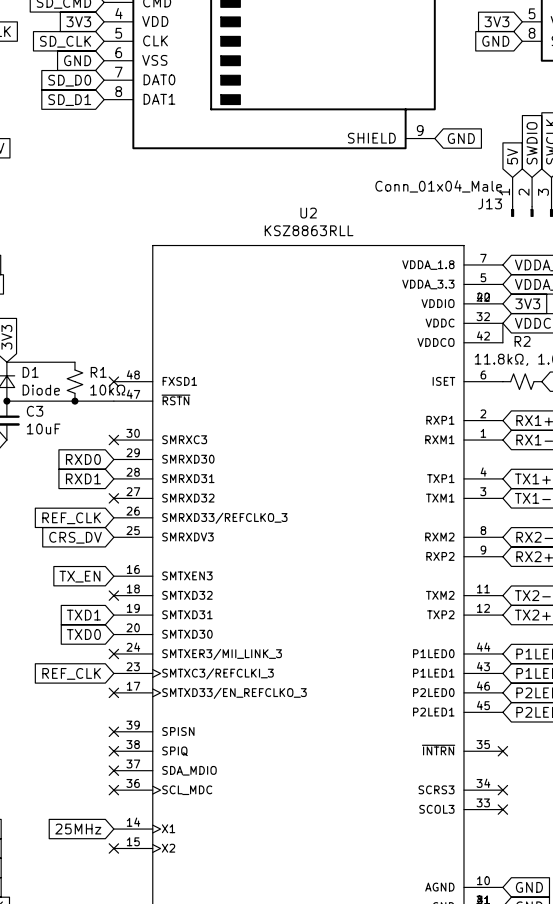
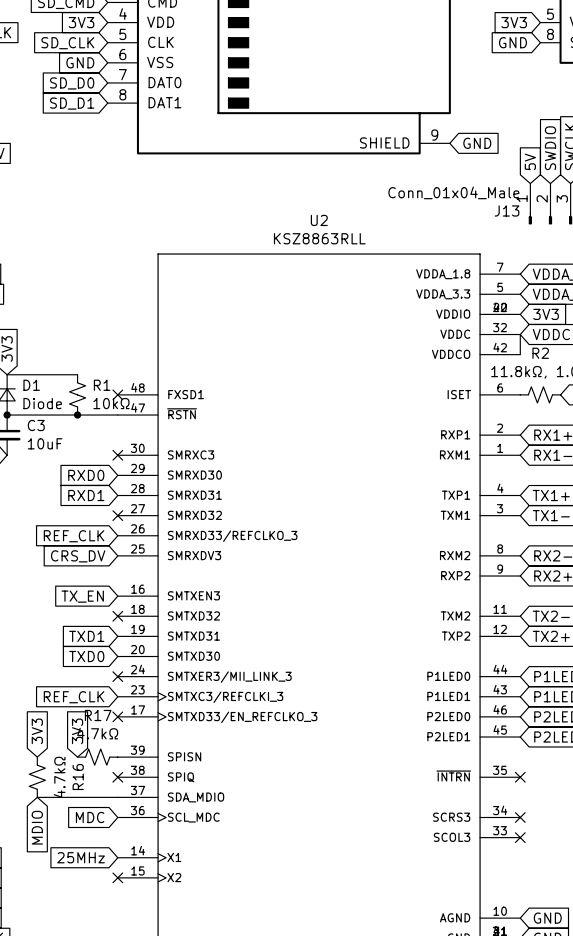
global label: none -> 3V3 (37, 731)
global label: none -> 3V3 (77, 731)
R17: none -> 4.7kΩ (97, 757)
no-connect mark: (113, 731) -> none
R16: none -> 4.7kΩ (37, 777)
wire: none -> (37, 797) (117, 797)
no-connect mark: (113, 770) -> none
global label: none -> MDC (90, 817)
no-connect mark: (113, 790) -> none
global label: none -> MDIO (37, 827)

